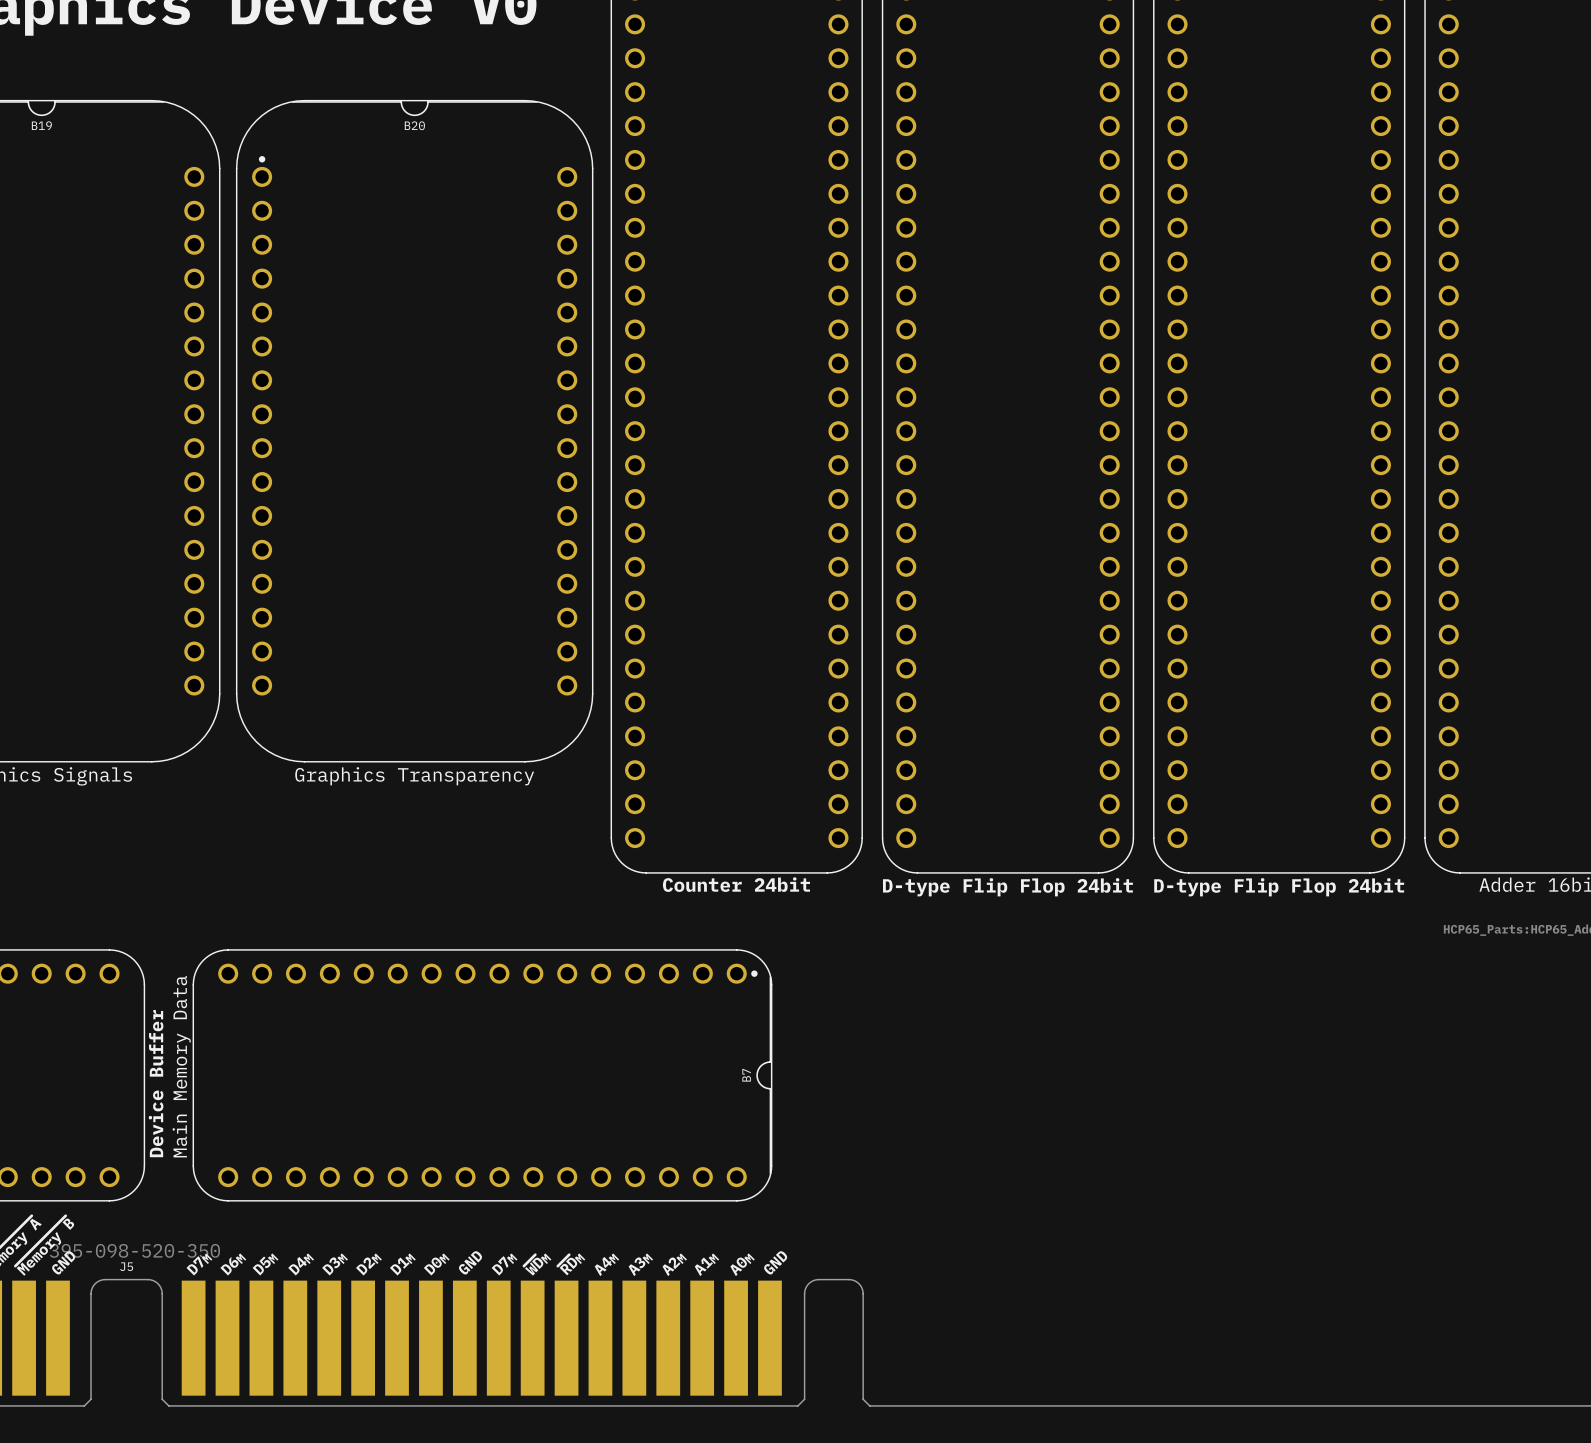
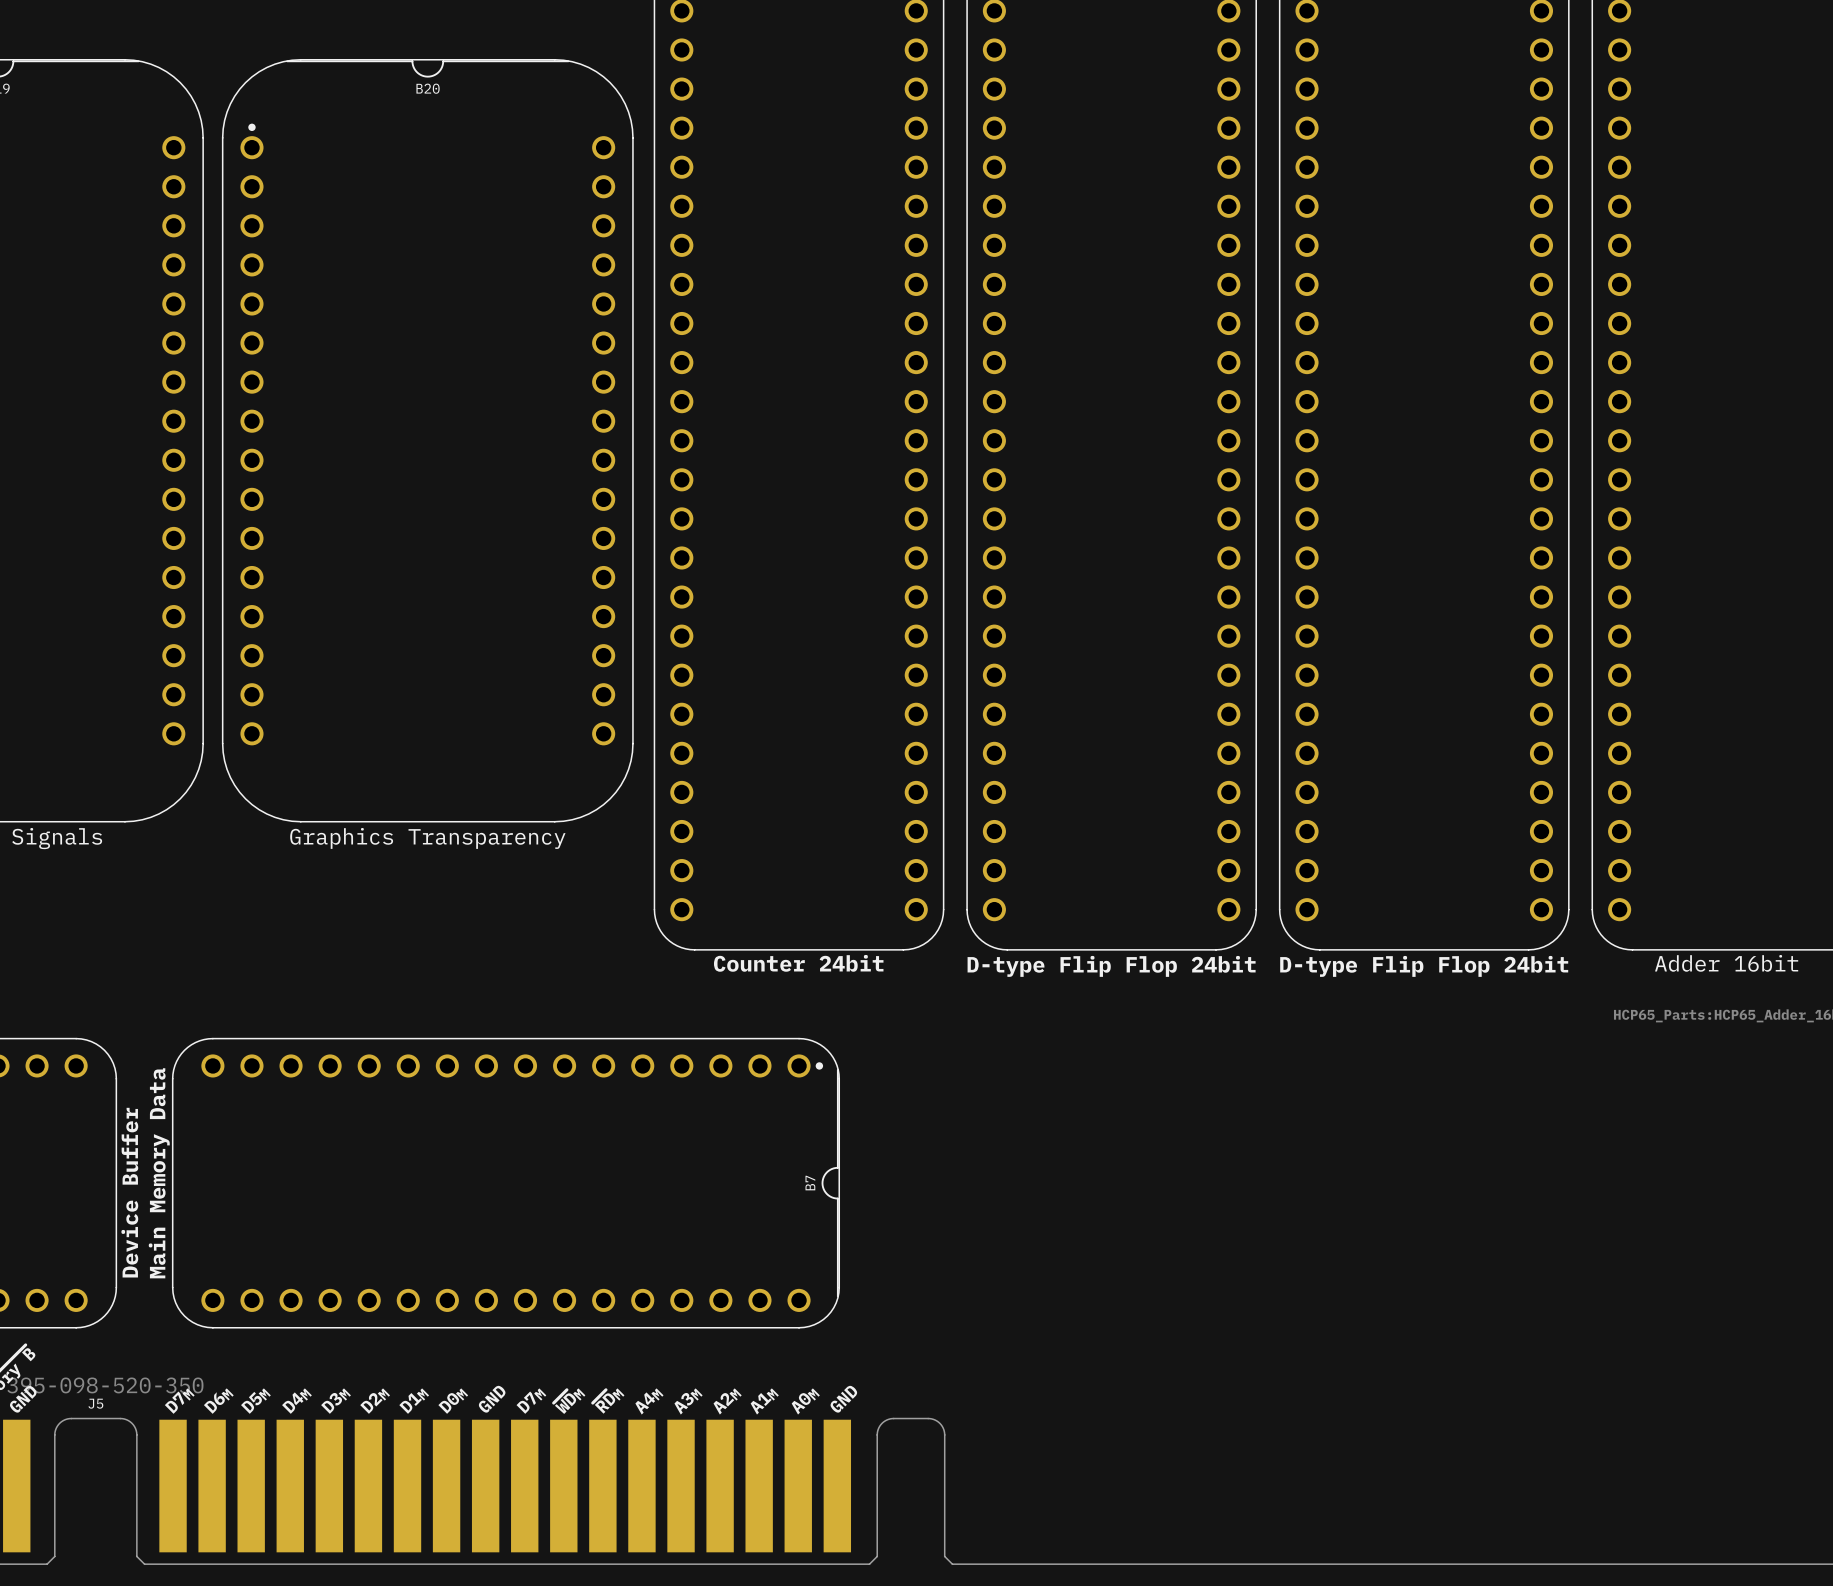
B7 footprint: [192, 949, 773, 1202] -> [171, 1037, 841, 1329]
B7 text: Main Memory Data (181, 1066) -> none

